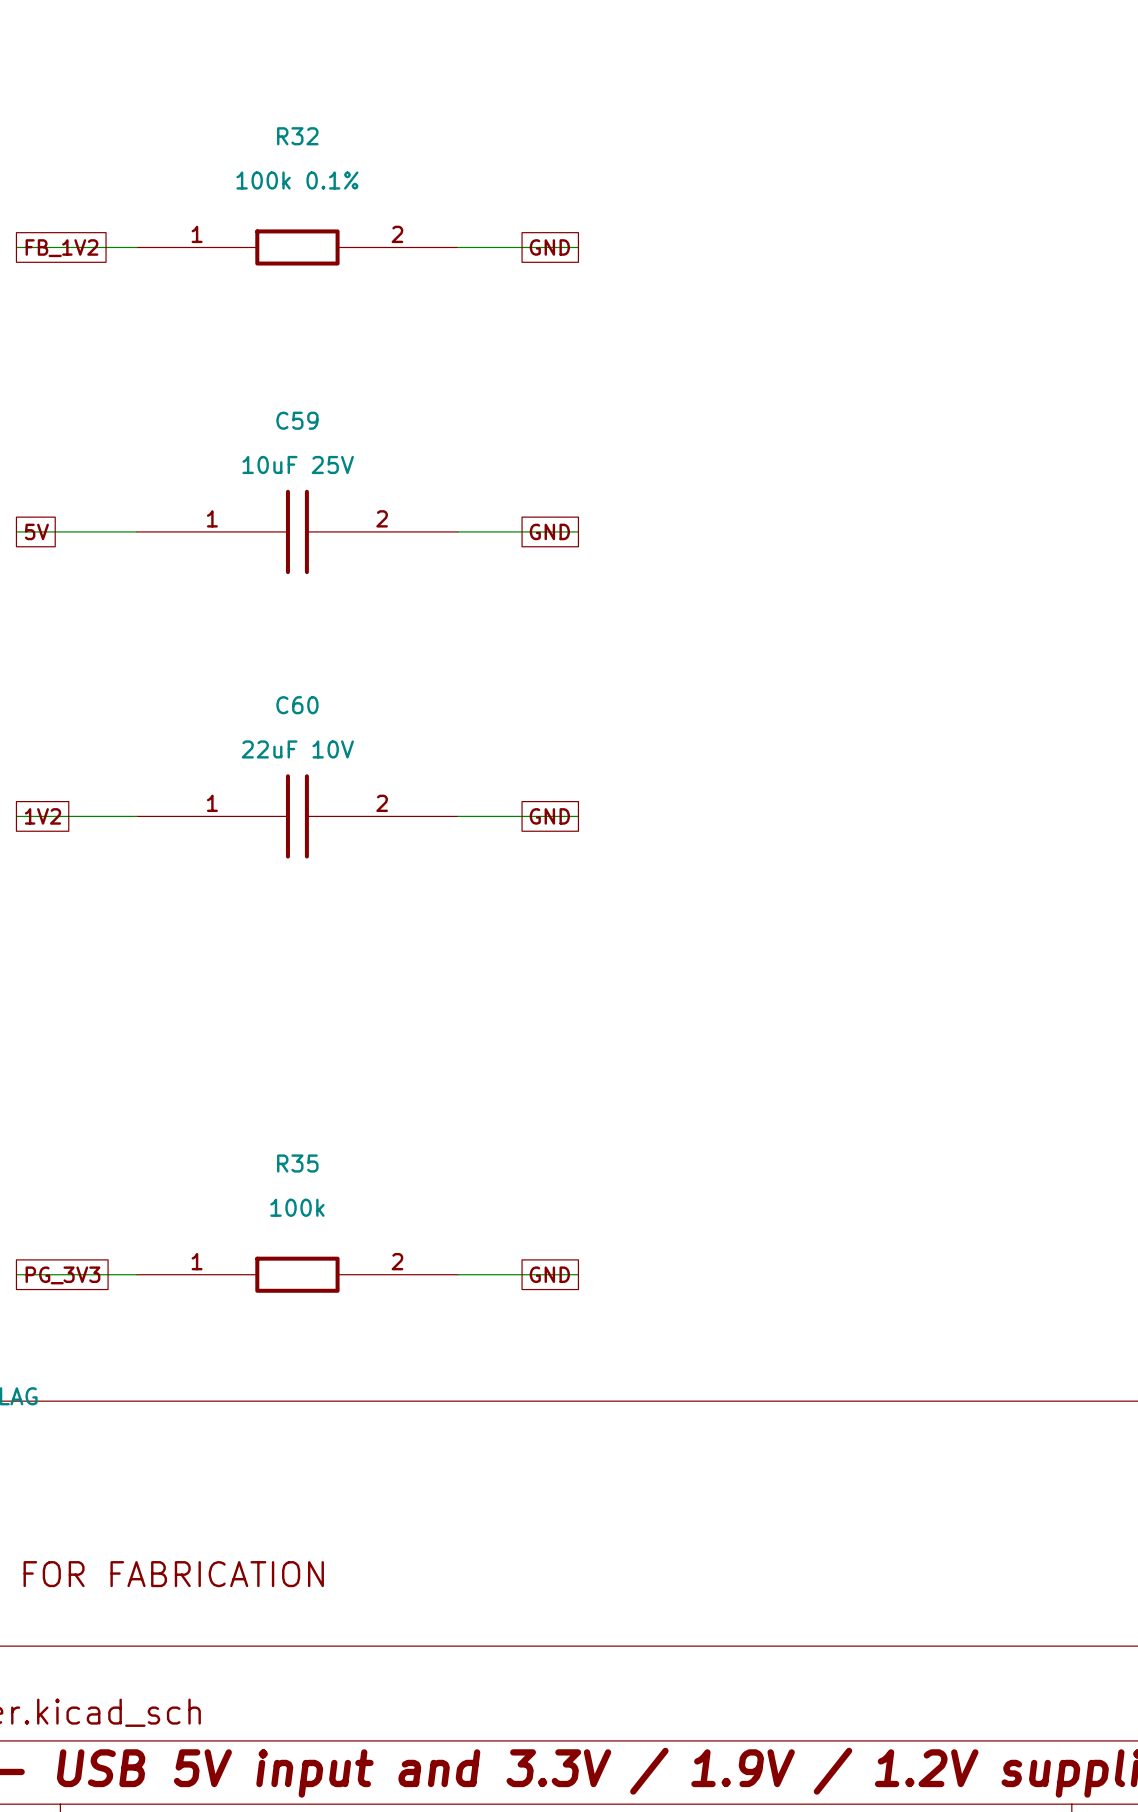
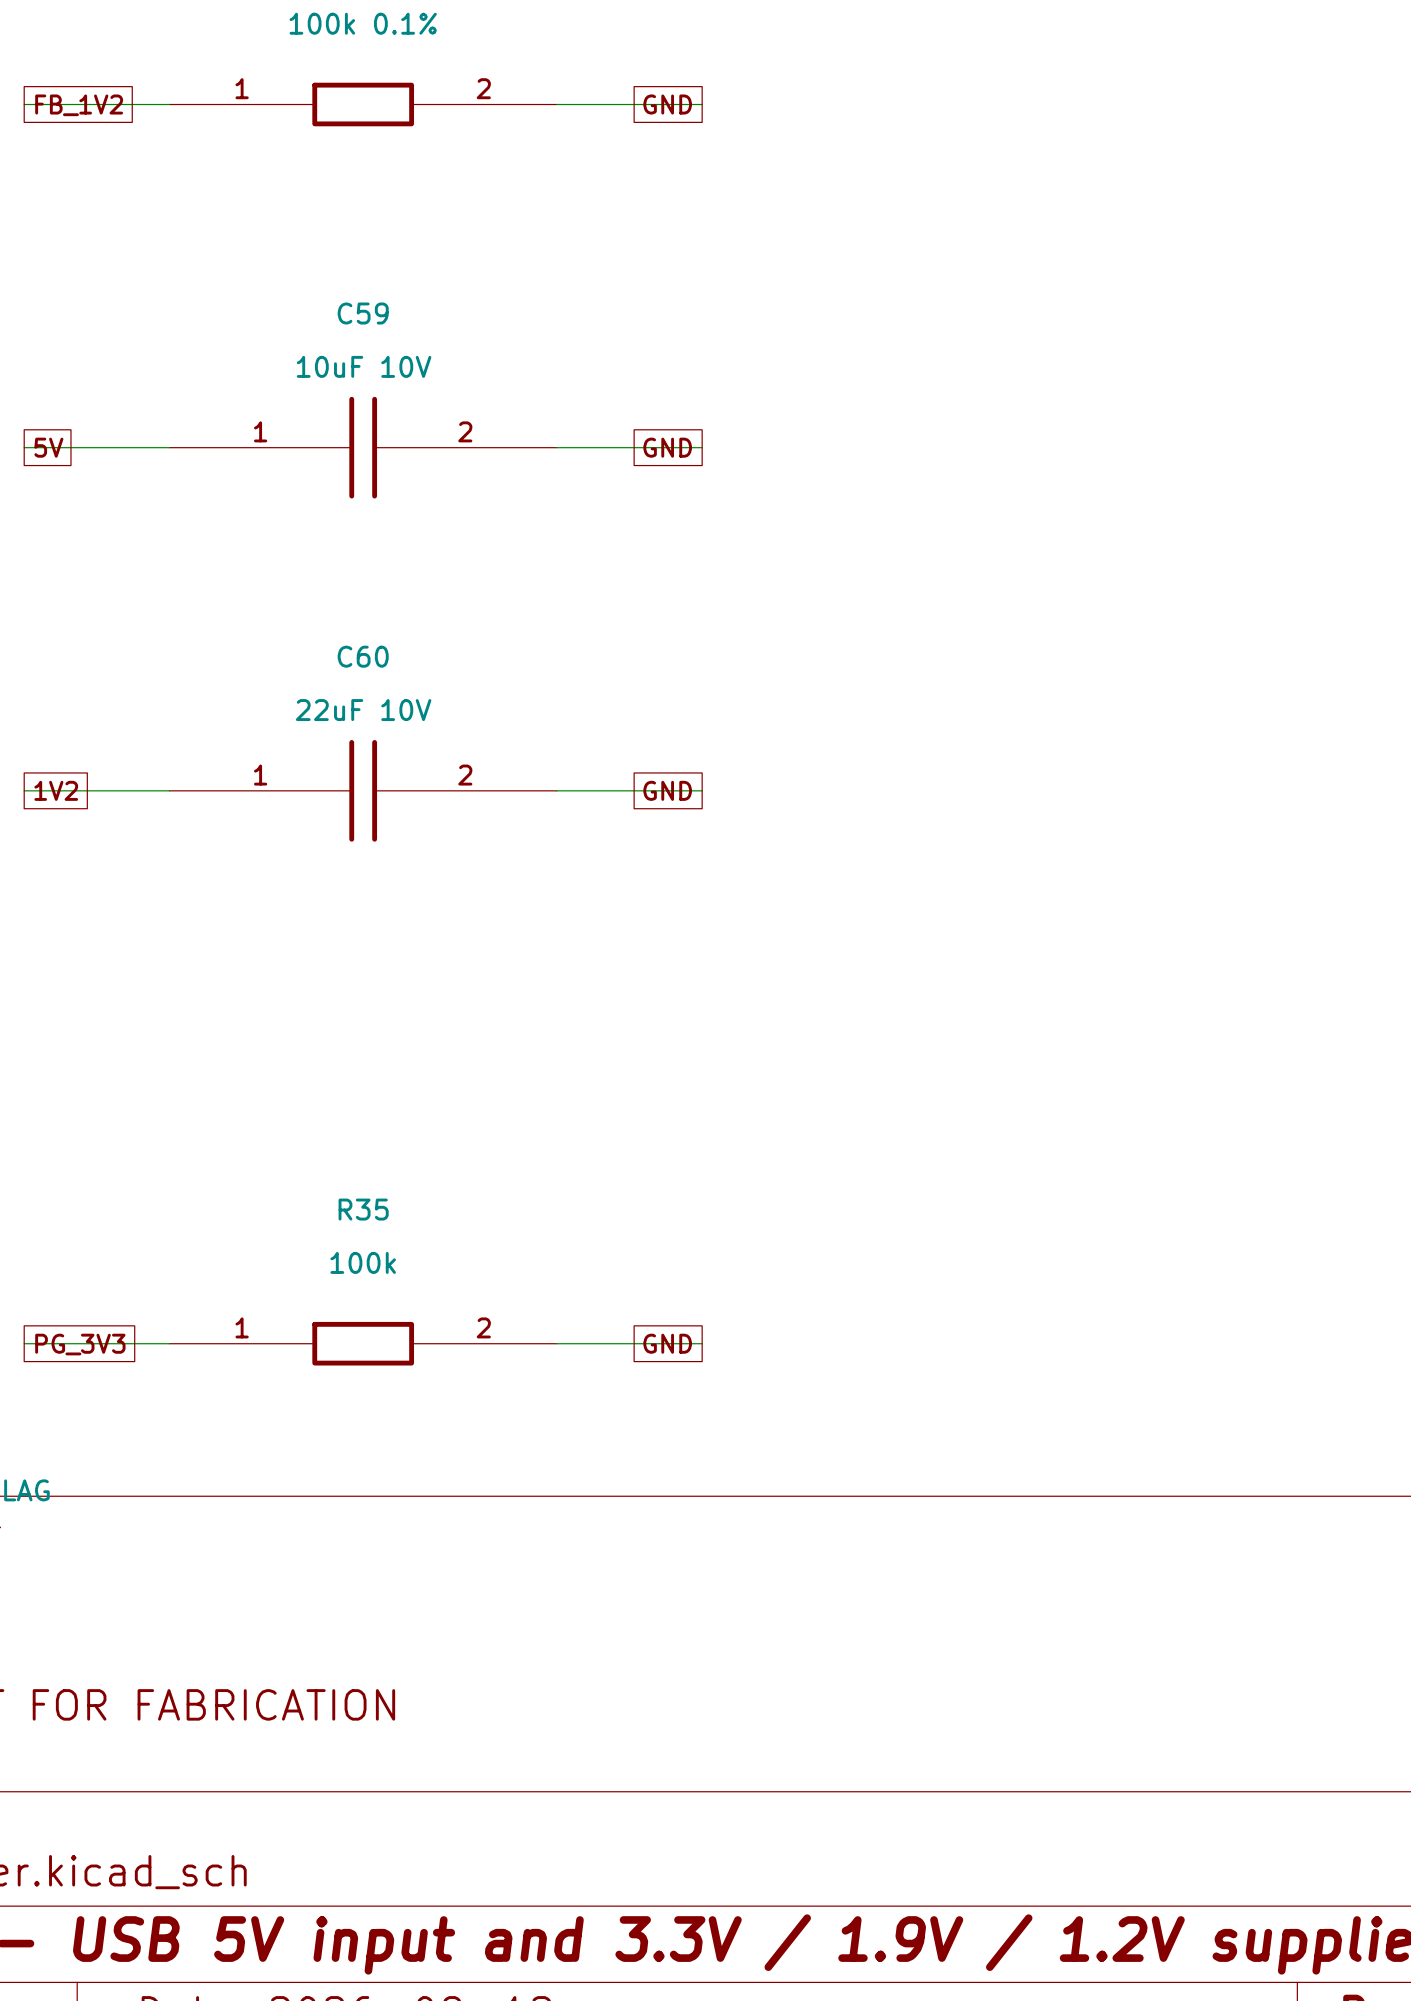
C59 value: 10uF 25V (298, 464) -> 10uF 10V (364, 366)

